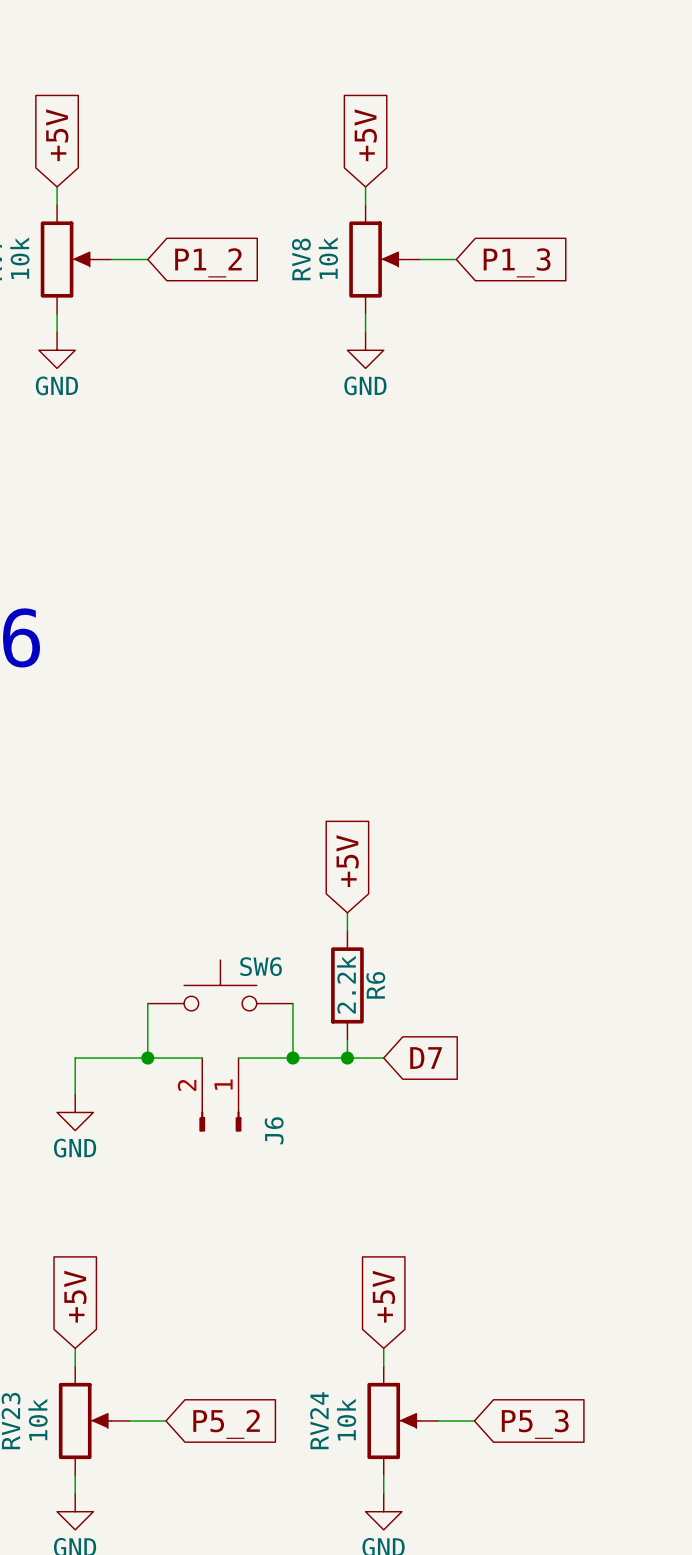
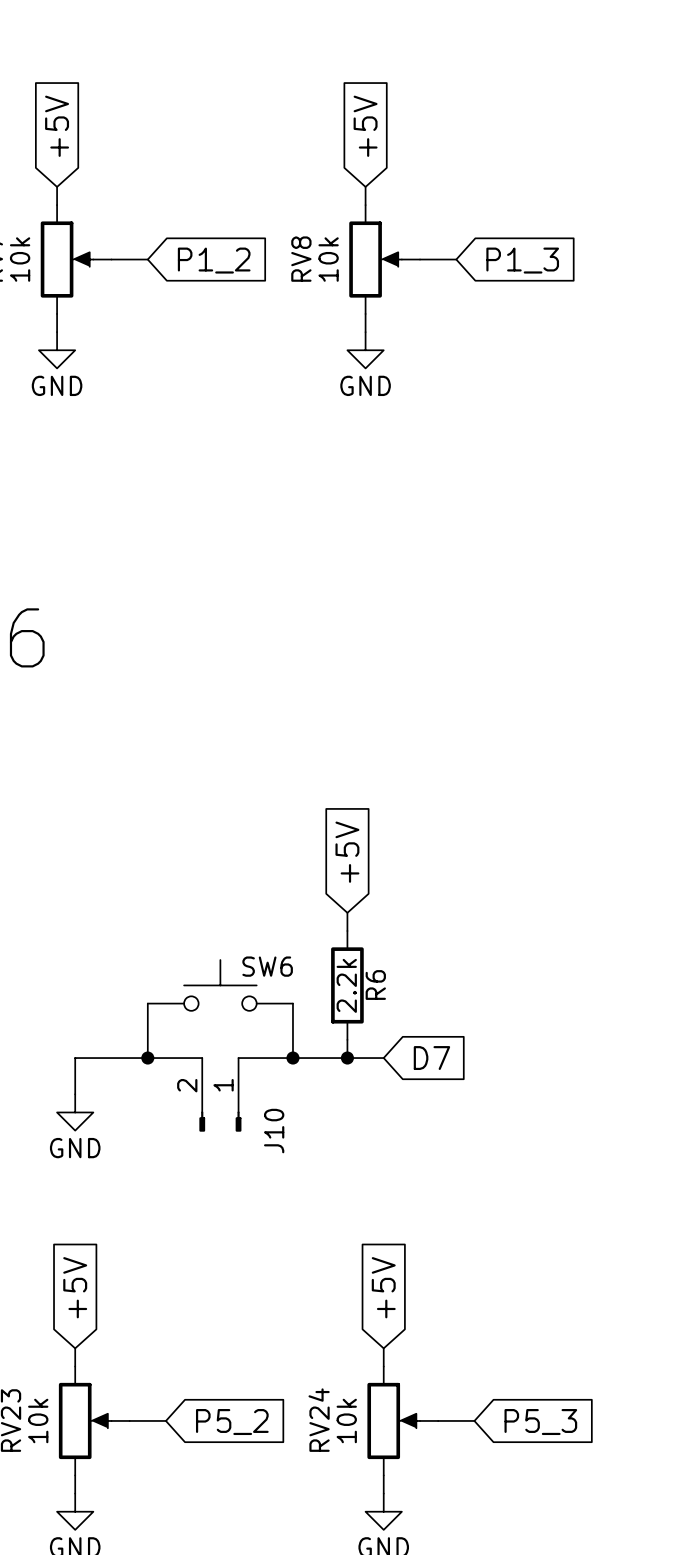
J6 name: J6 (274, 1130) -> J10 (274, 1131)

